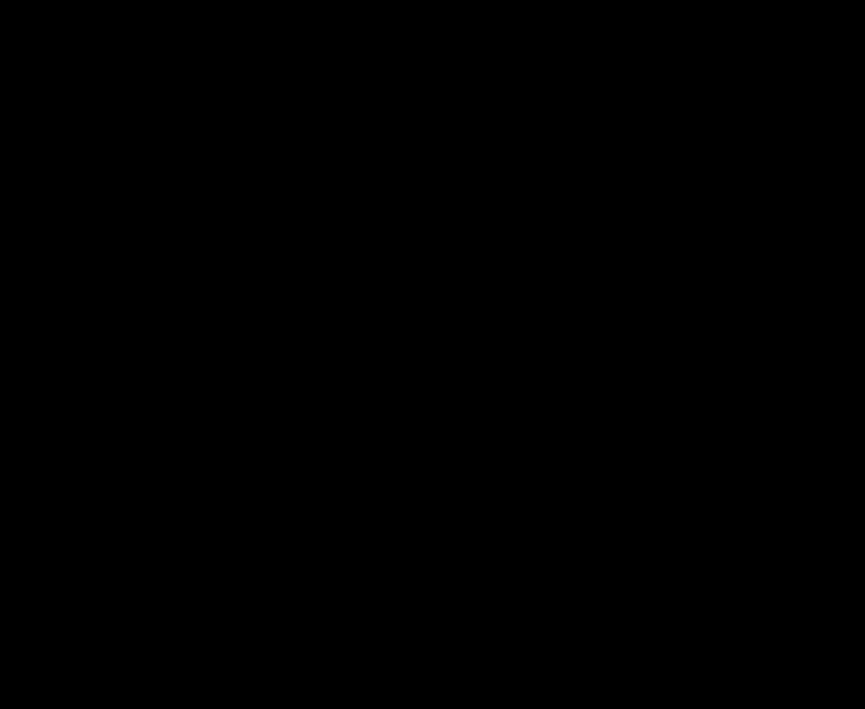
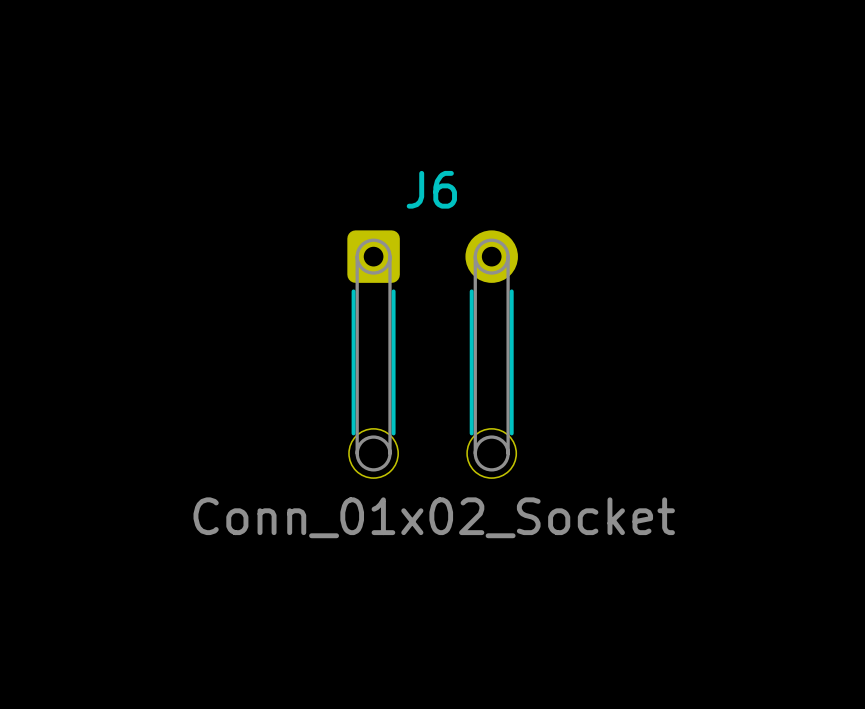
J6: none -> Conn_01x02_Socket (432, 354)

